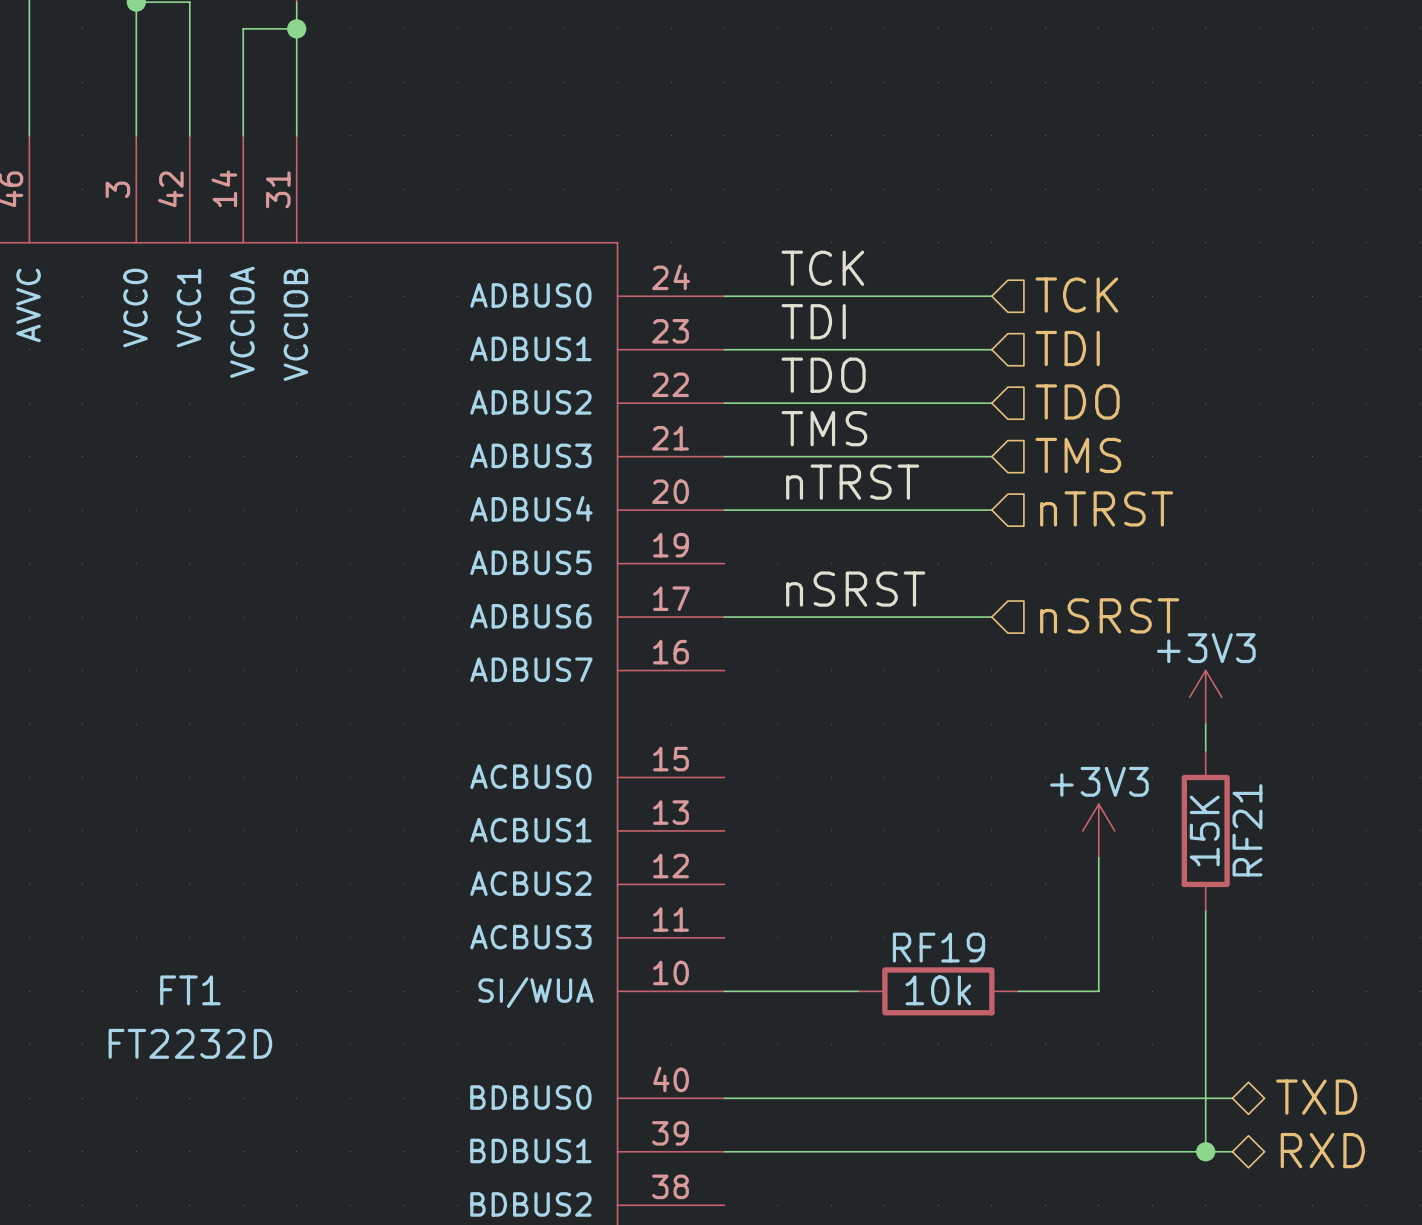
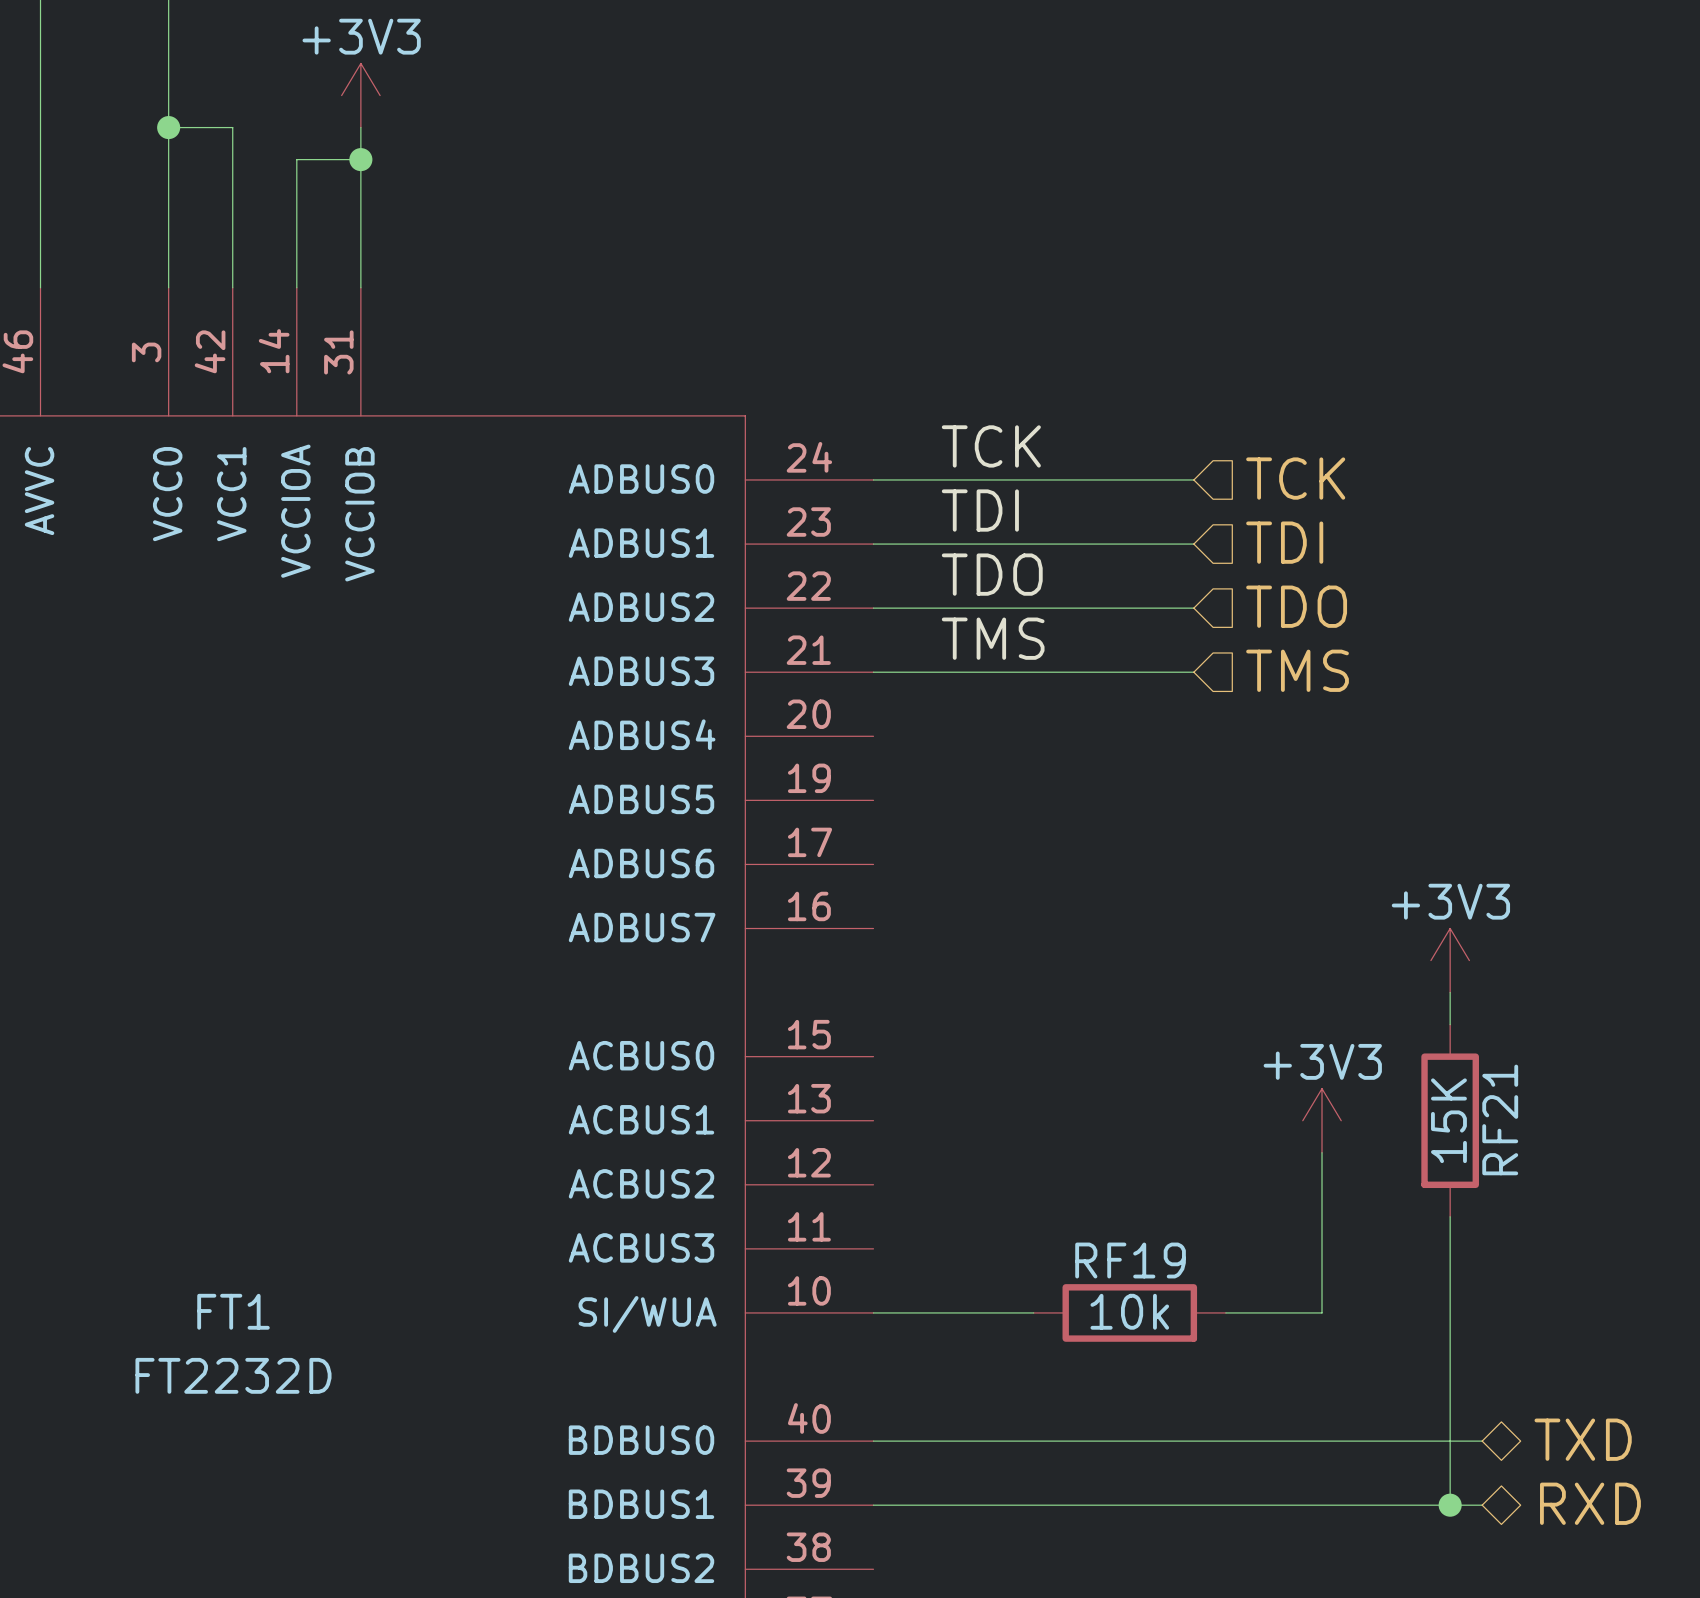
label: nTRST (852, 482) -> none
hierarchical label: nTRST (1106, 508) -> none
wire: (724, 510) (991, 510) -> none
label: nSRST (855, 589) -> none
hierarchical label: nSRST (1109, 615) -> none
wire: (724, 617) (991, 617) -> none

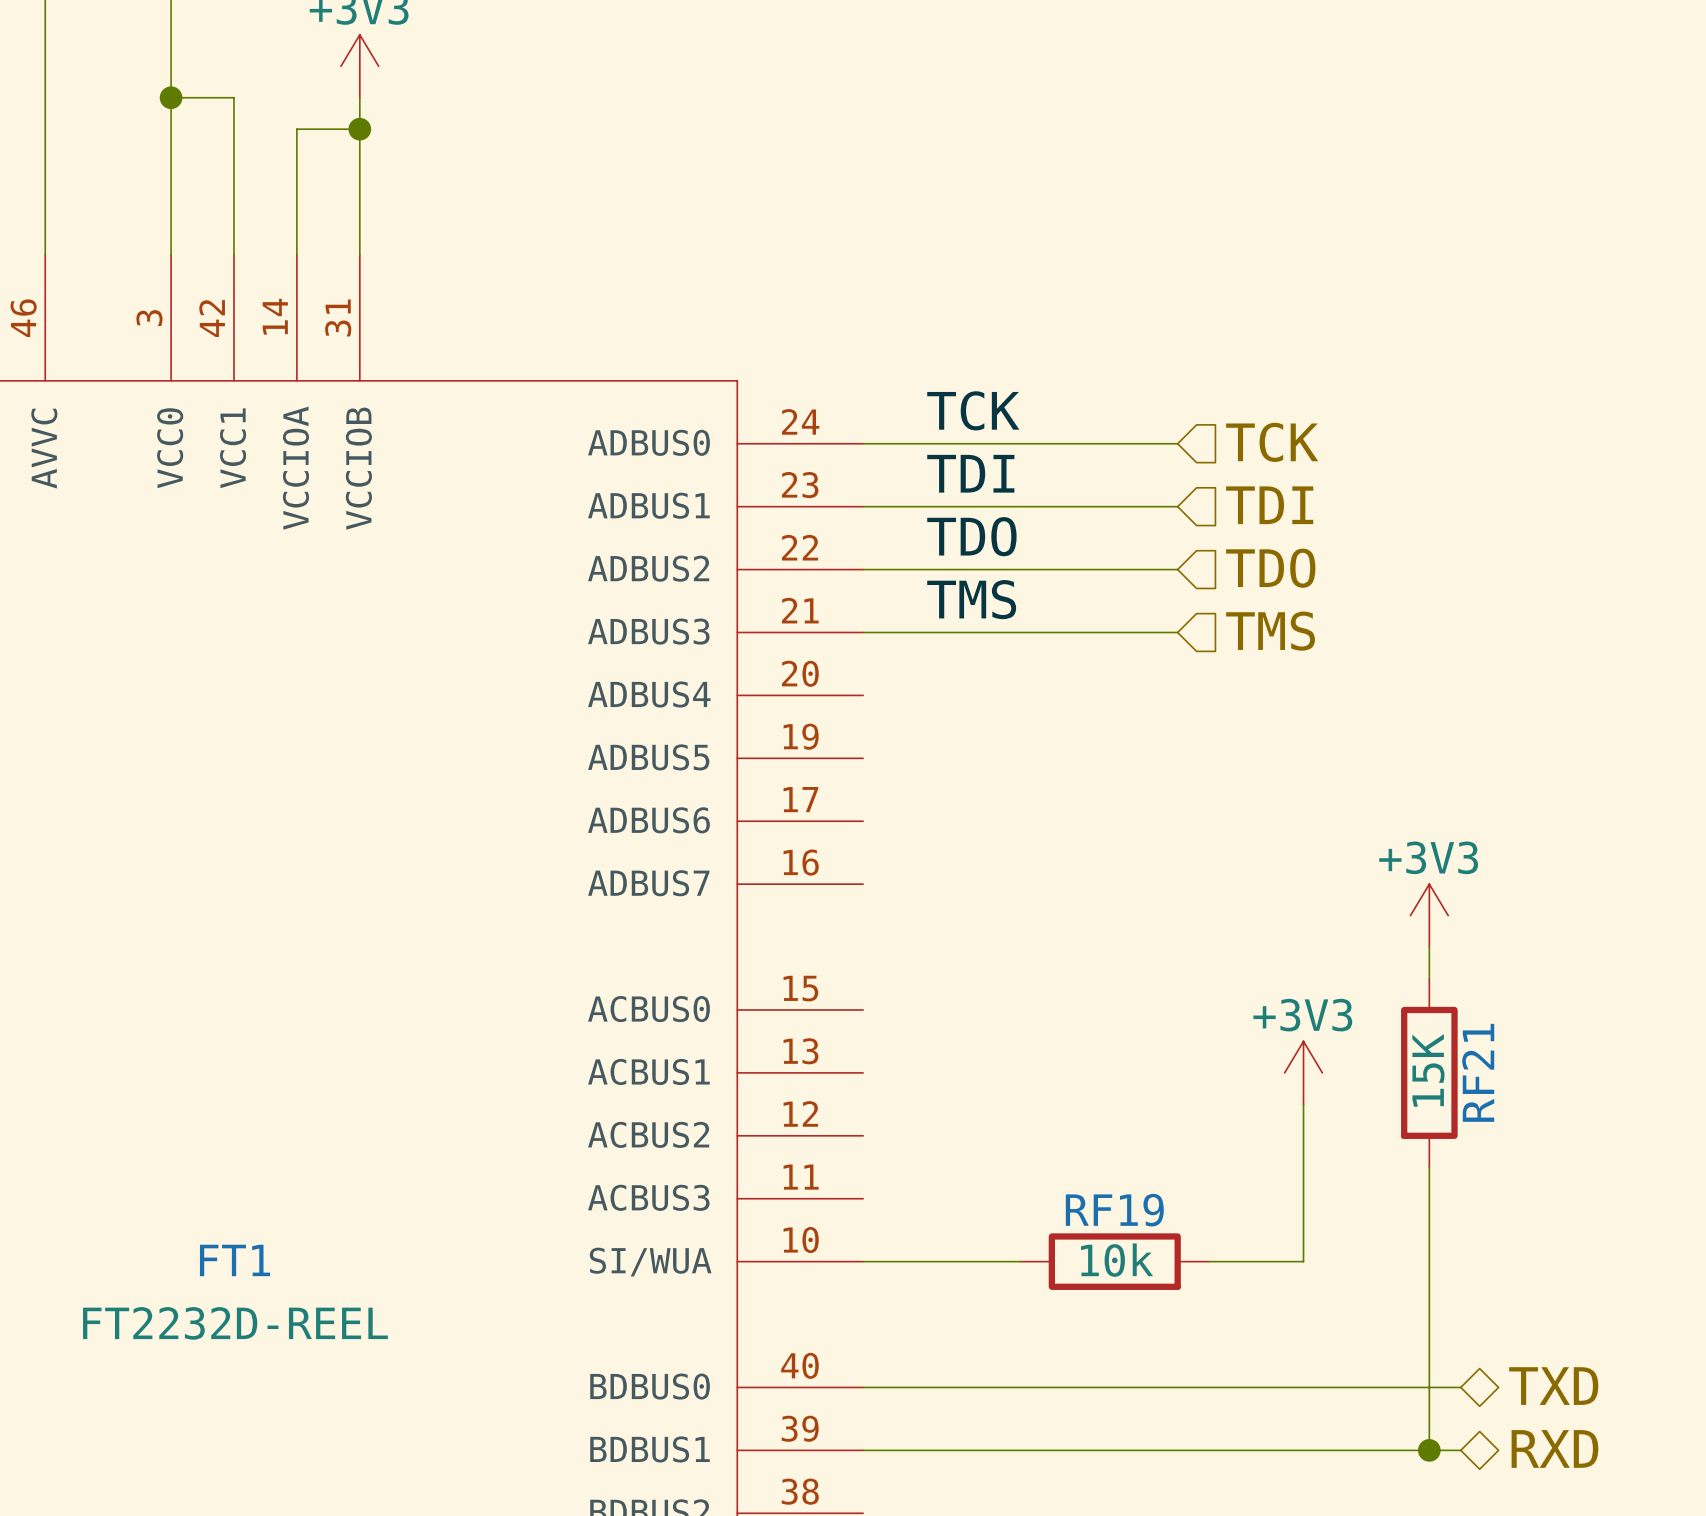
FT1 value: FT2232D (233, 1375) -> FT2232D-REEL (235, 1323)

